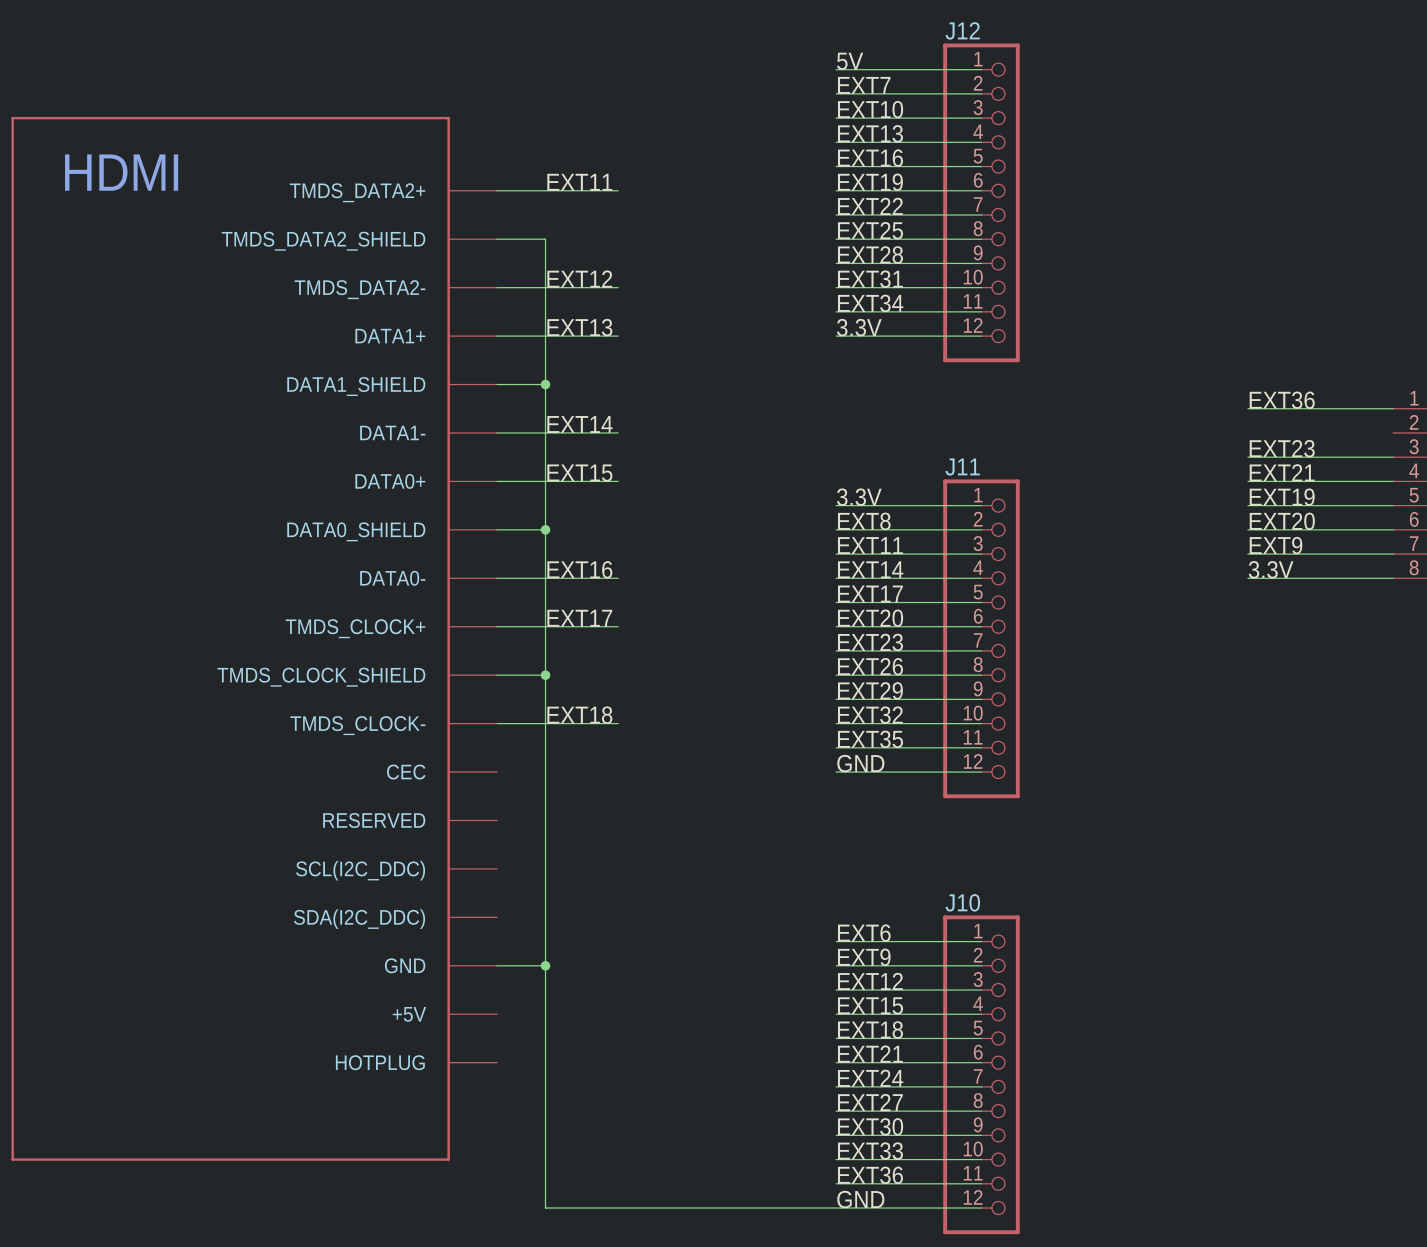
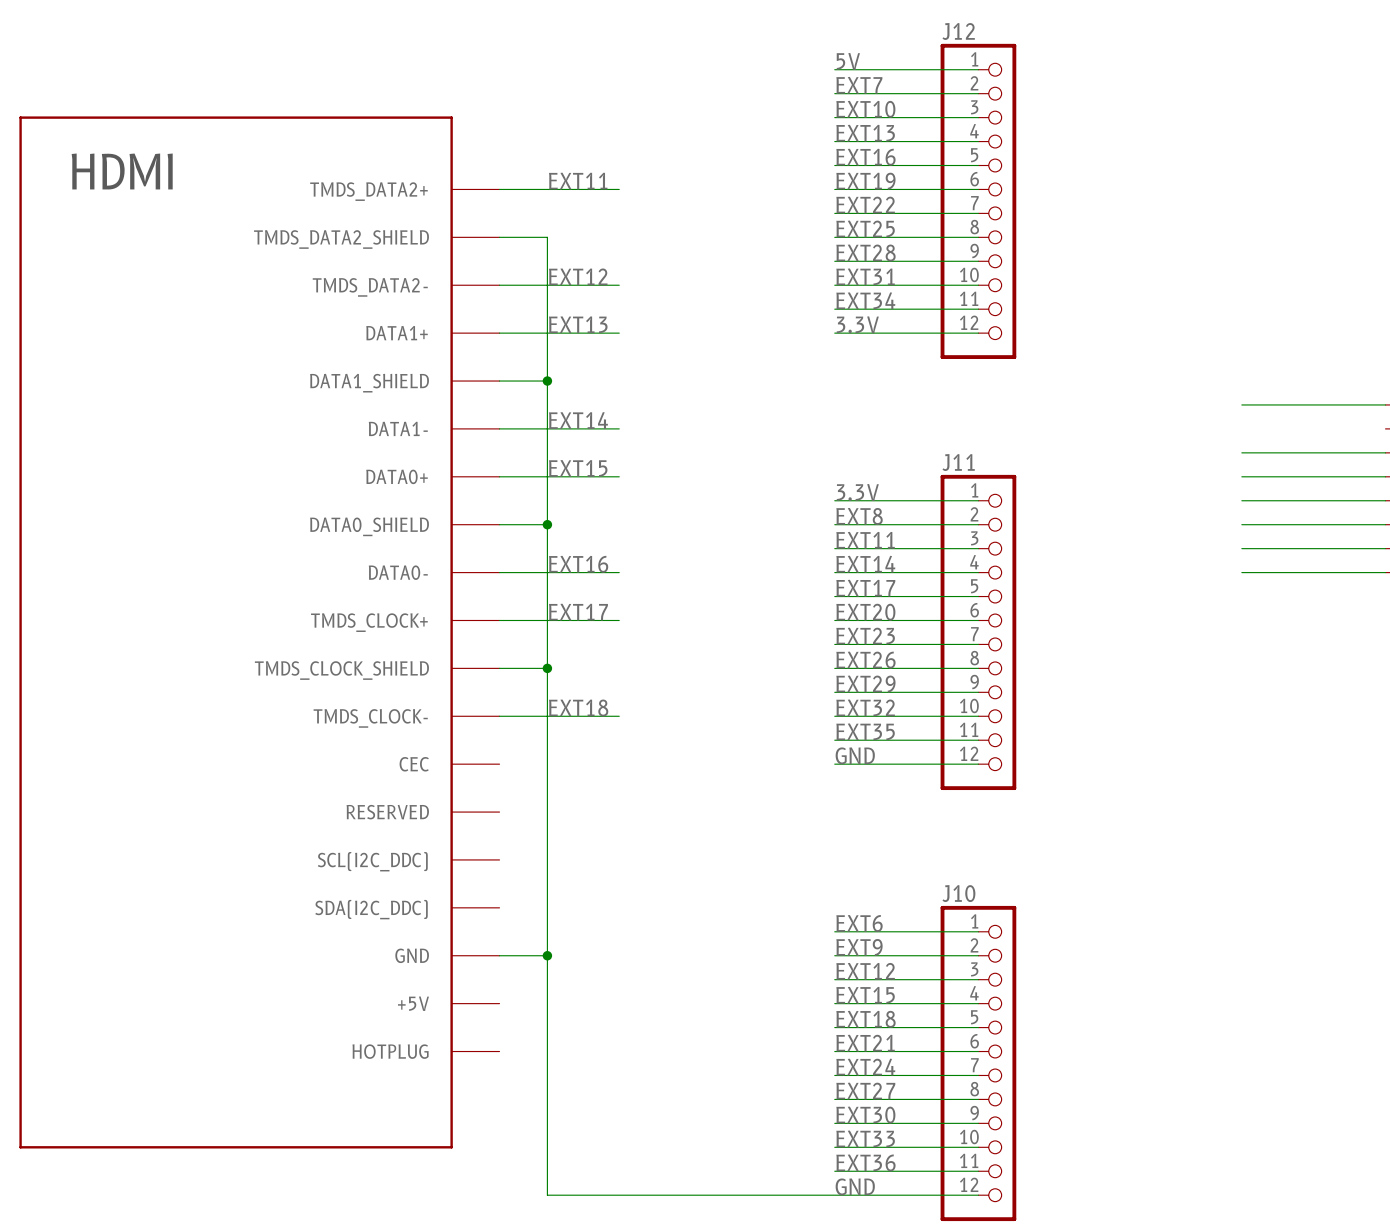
label: EXT36 (1282, 400) -> none
label: EXT23 (1282, 448) -> none
label: EXT21 (1282, 472) -> none
label: EXT19 (1282, 497) -> none
label: EXT20 (1282, 521) -> none
label: EXT9 (1276, 545) -> none
label: 3.3V (1271, 569) -> none

